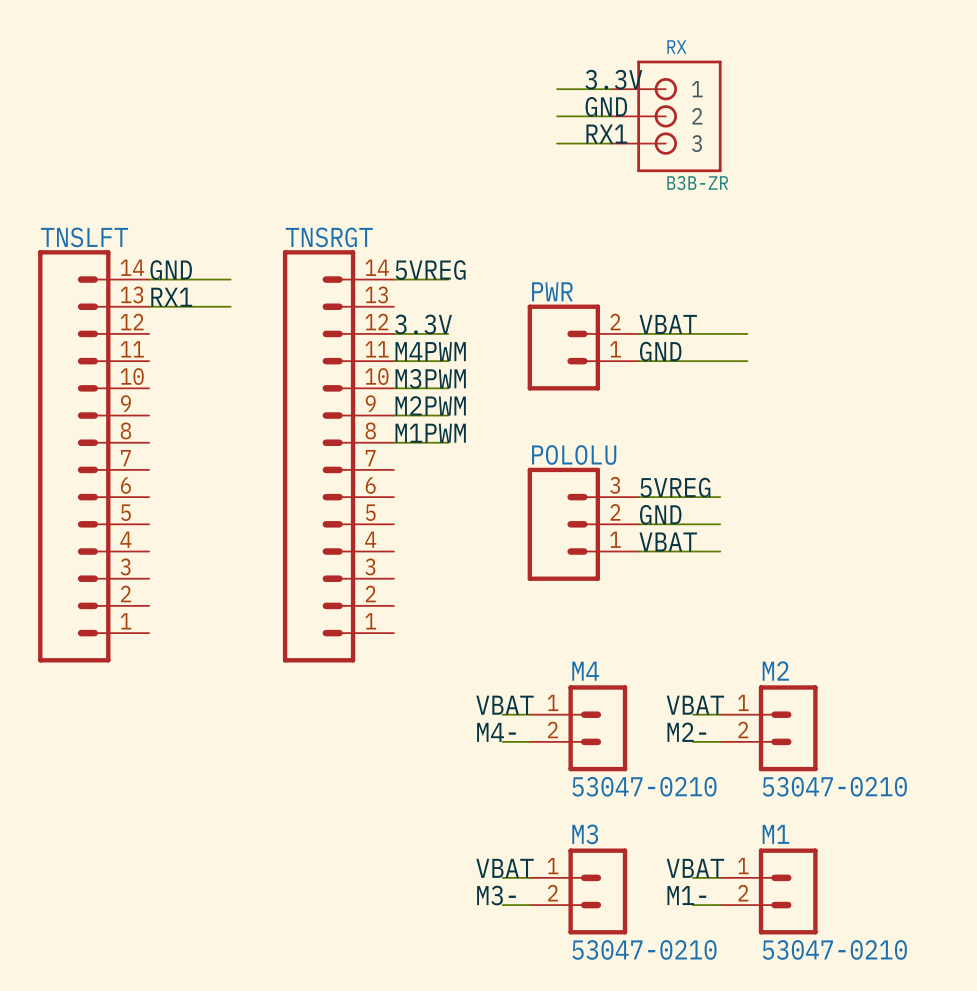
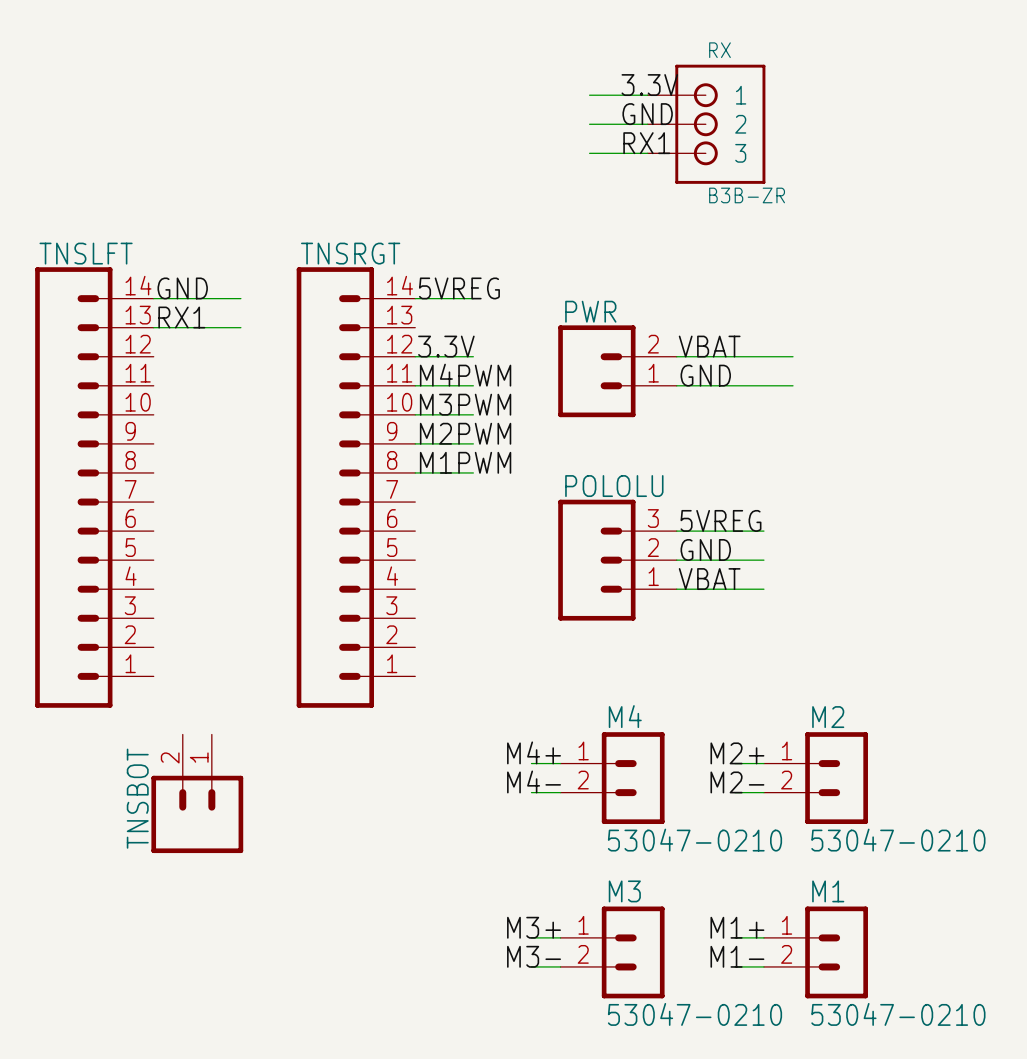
label: VBAT (505, 705) -> M4+ (534, 752)
label: VBAT (695, 705) -> M2+ (737, 753)
TNSBOT: none -> (197, 793)
label: VBAT (505, 868) -> M3+ (534, 927)
label: VBAT (695, 868) -> M1+ (737, 927)

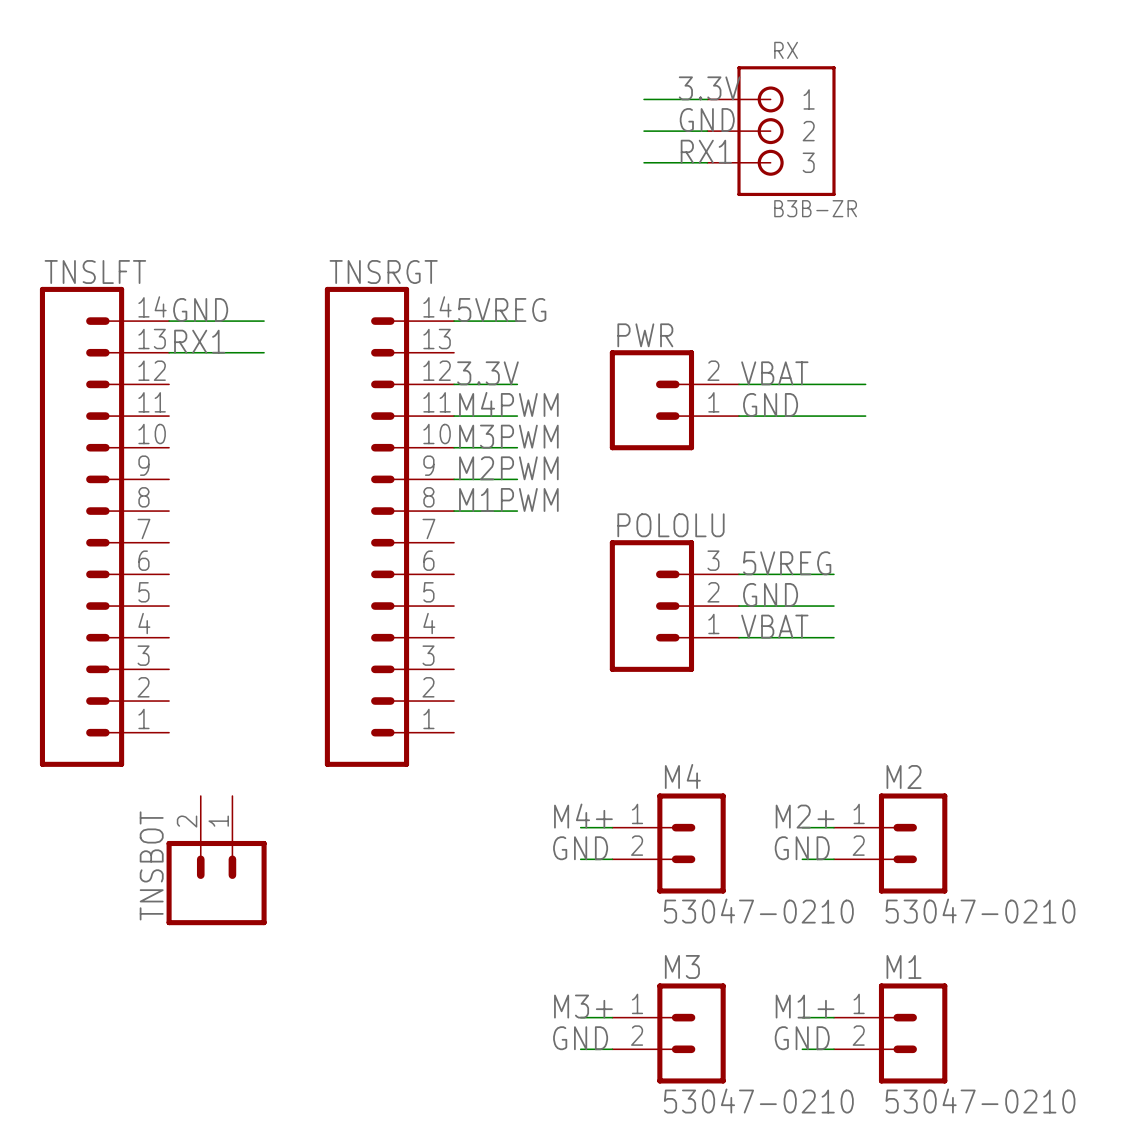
label: M4- (534, 781) -> GND (580, 848)
label: M2- (737, 782) -> GND (802, 848)
label: M3- (534, 956) -> GND (580, 1038)
label: M1- (737, 956) -> GND (802, 1038)

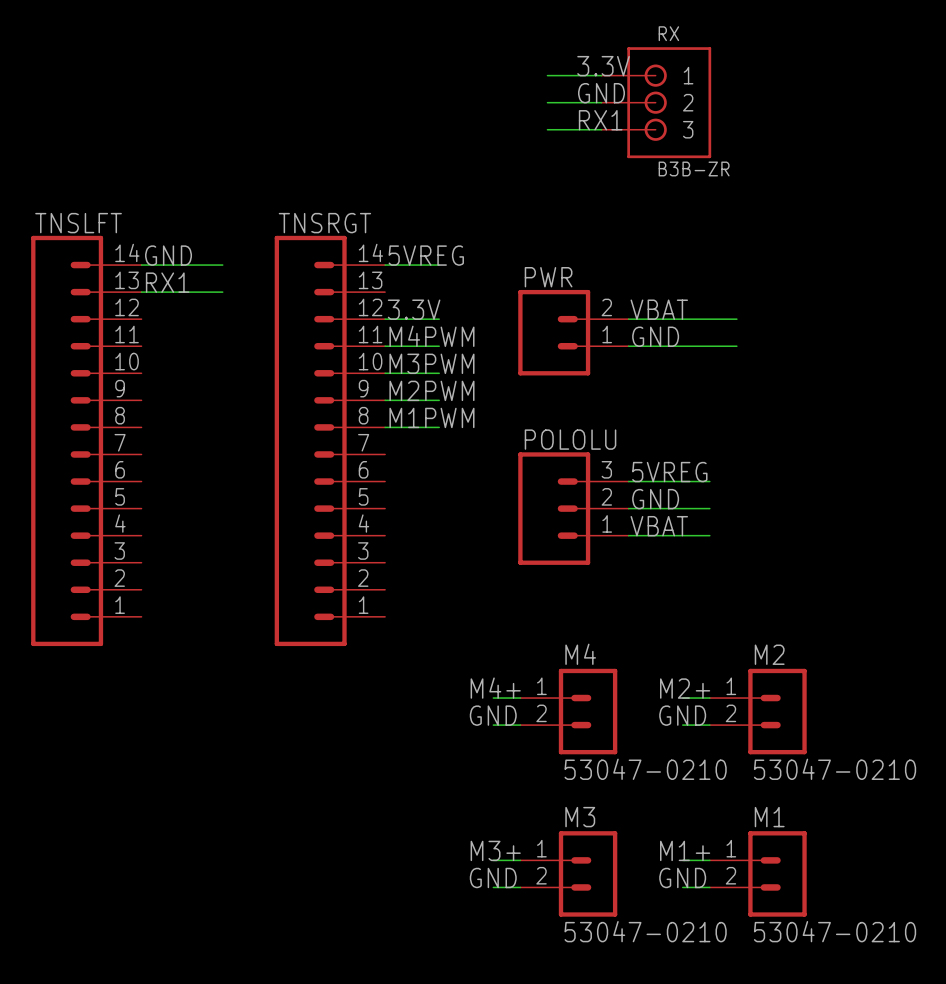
TNSBOT: (216, 860) -> none

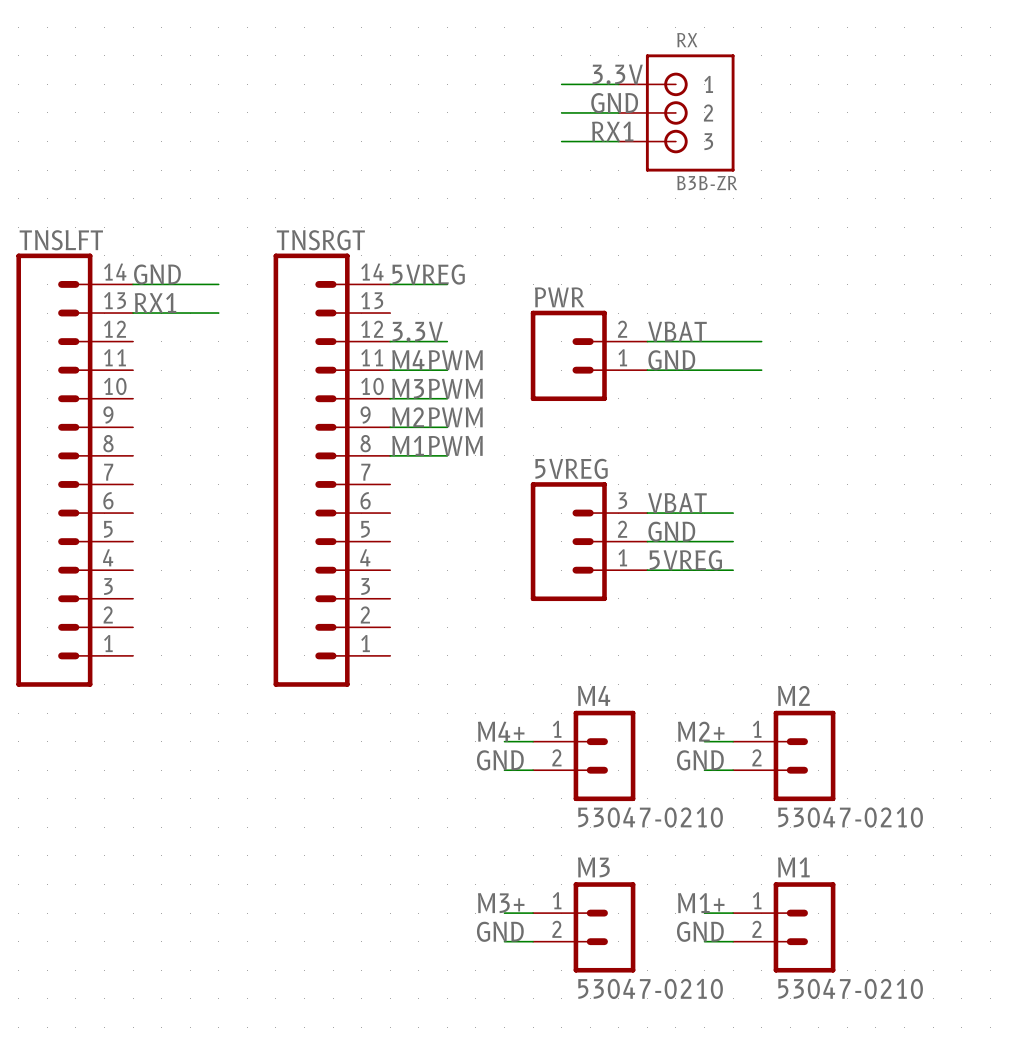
POLOLU name: POLOLU (570, 439) -> 5VREG (571, 468)
label: 5VREG (669, 472) -> VBAT (677, 503)
label: VBAT (659, 526) -> 5VREG (685, 560)

